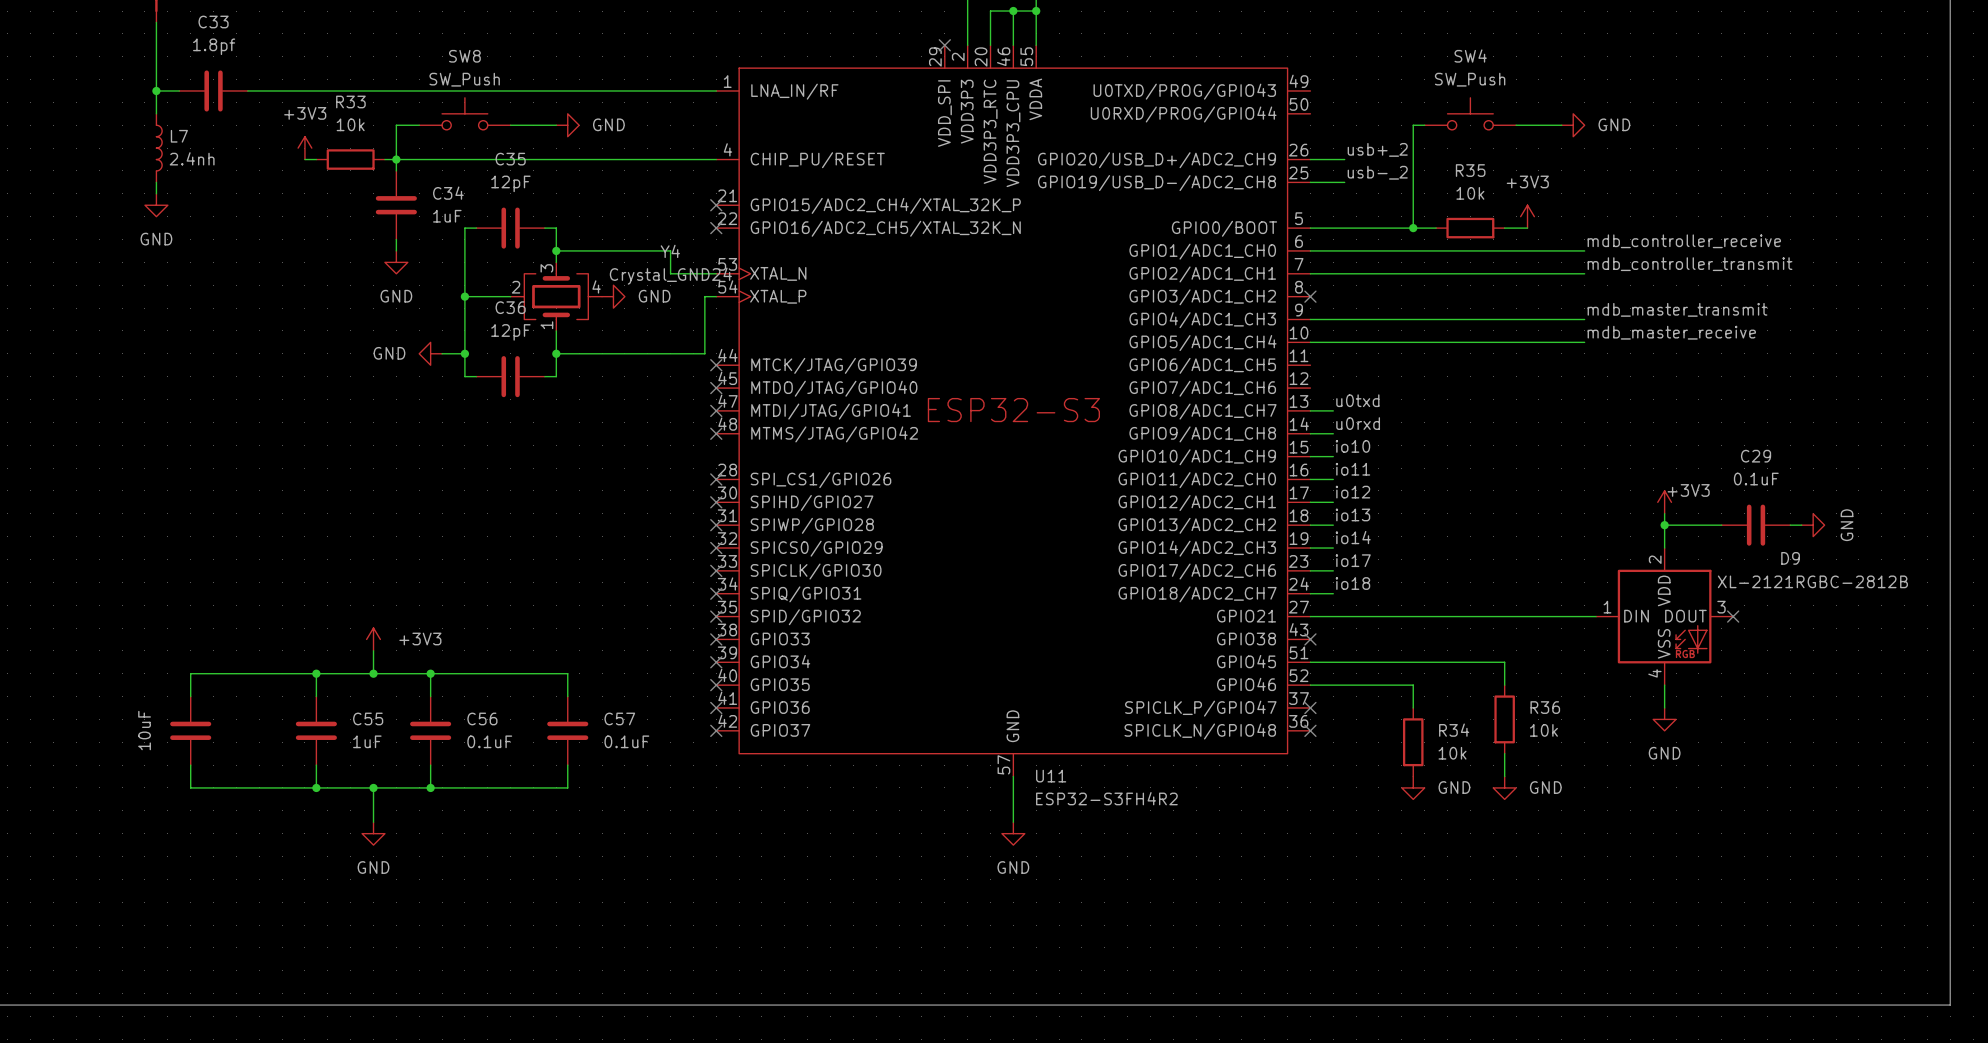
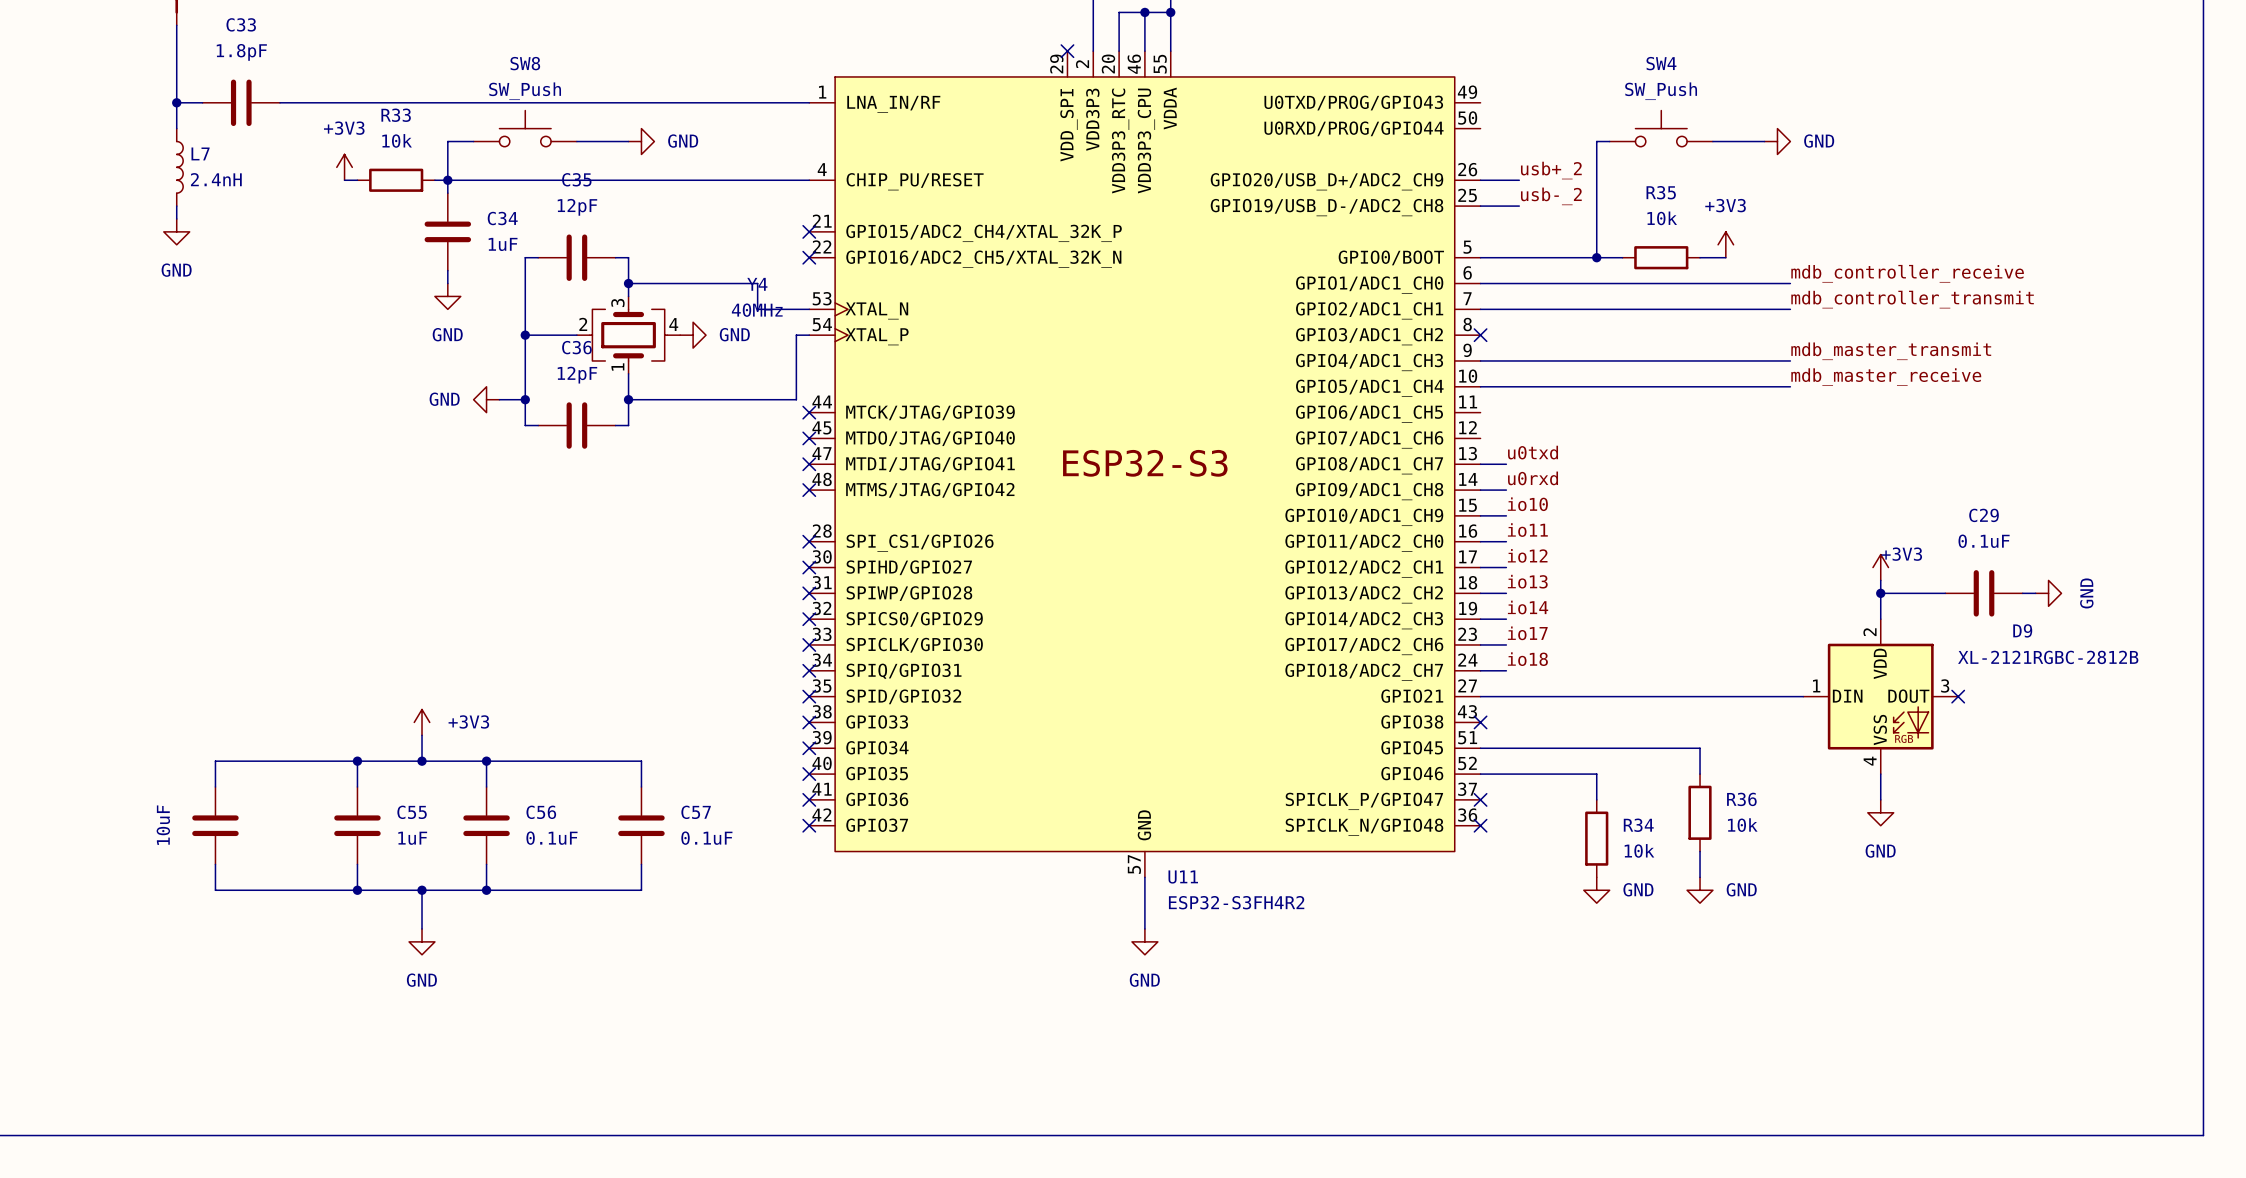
C33 value: 1.8pf (214, 46) -> 1.8pF (241, 52)
L7 value: 2.4nh (192, 158) -> 2.4nH (216, 179)
Y4 value: Crystal_GND24 (670, 276) -> 40MHz (757, 310)

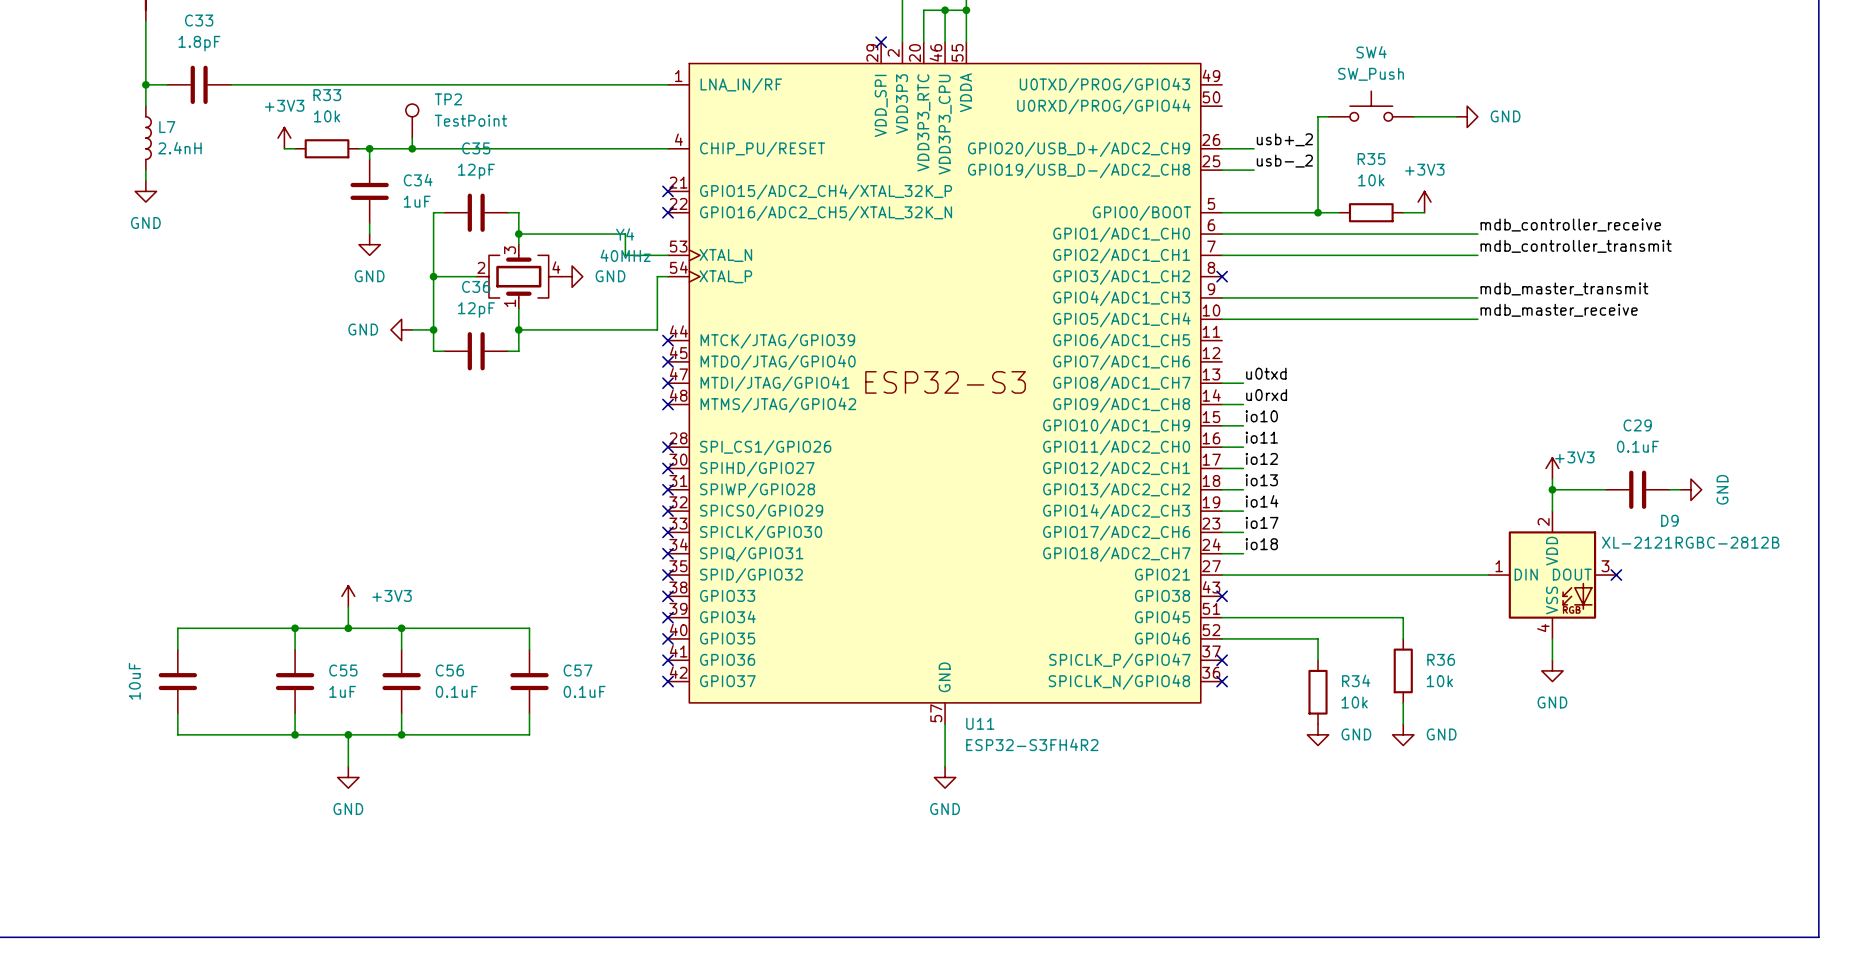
SW8: SW_Push (525, 128) -> none
wire: (473, 141) (447, 141) (447, 180) -> none
wire: (576, 141) (628, 141) -> none
power symbol: GND (641, 141) -> none
TP2: none -> TestPoint (412, 121)
wire: none -> (412, 138) (412, 148)
junction: none -> (412, 148)

